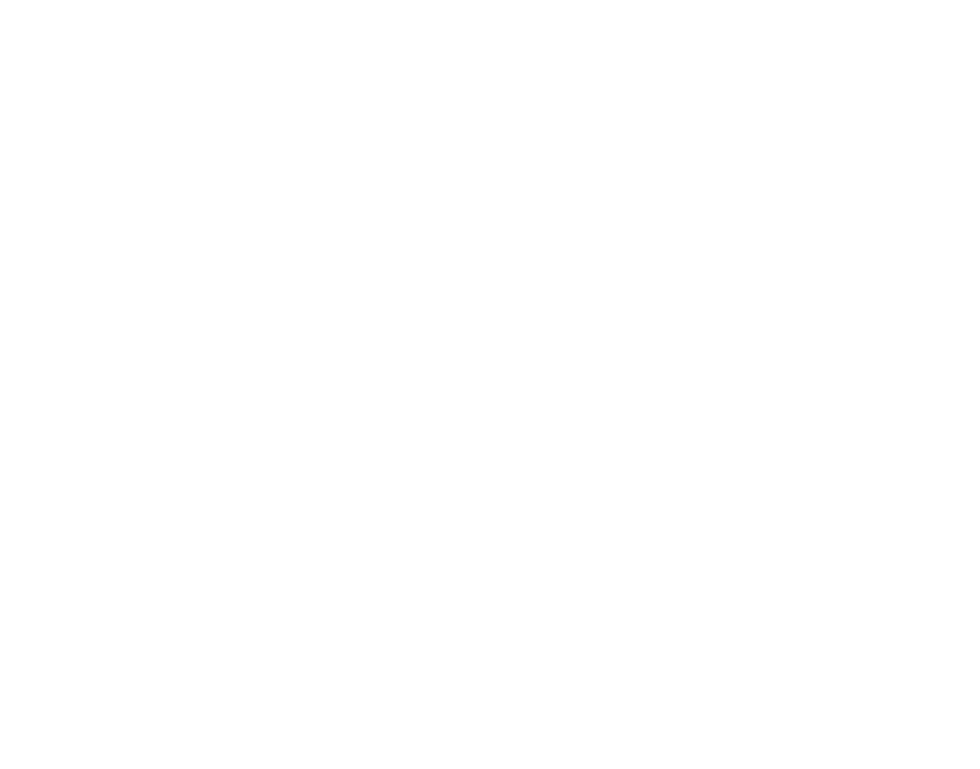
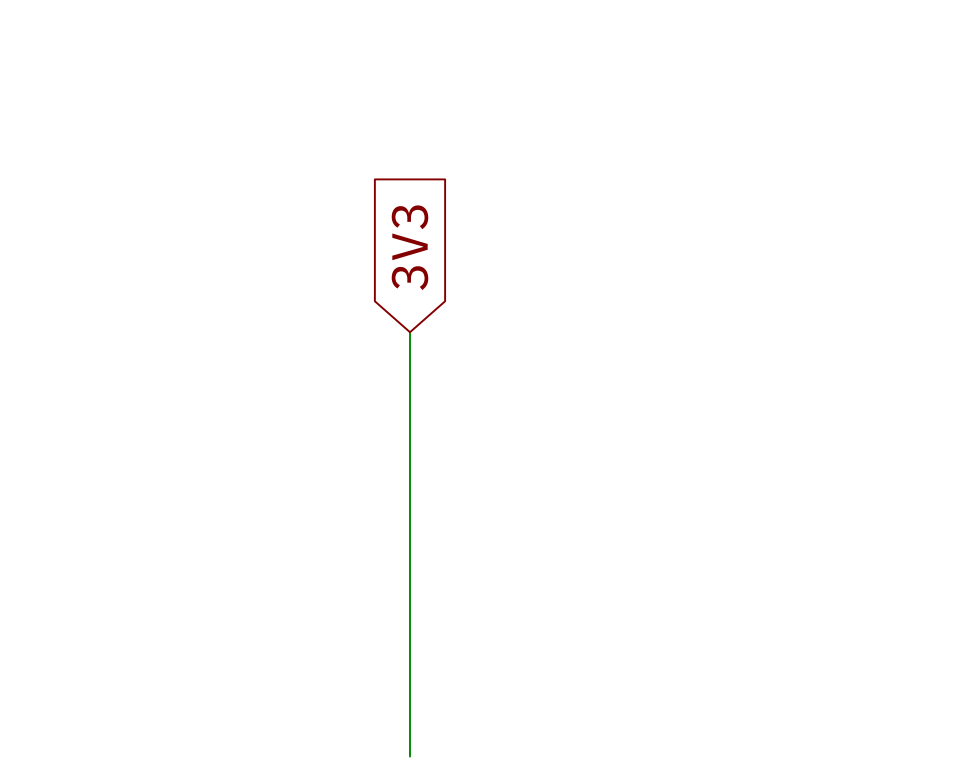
global label: none -> 3V3 (409, 247)
wire: none -> (409, 332) (409, 756)

